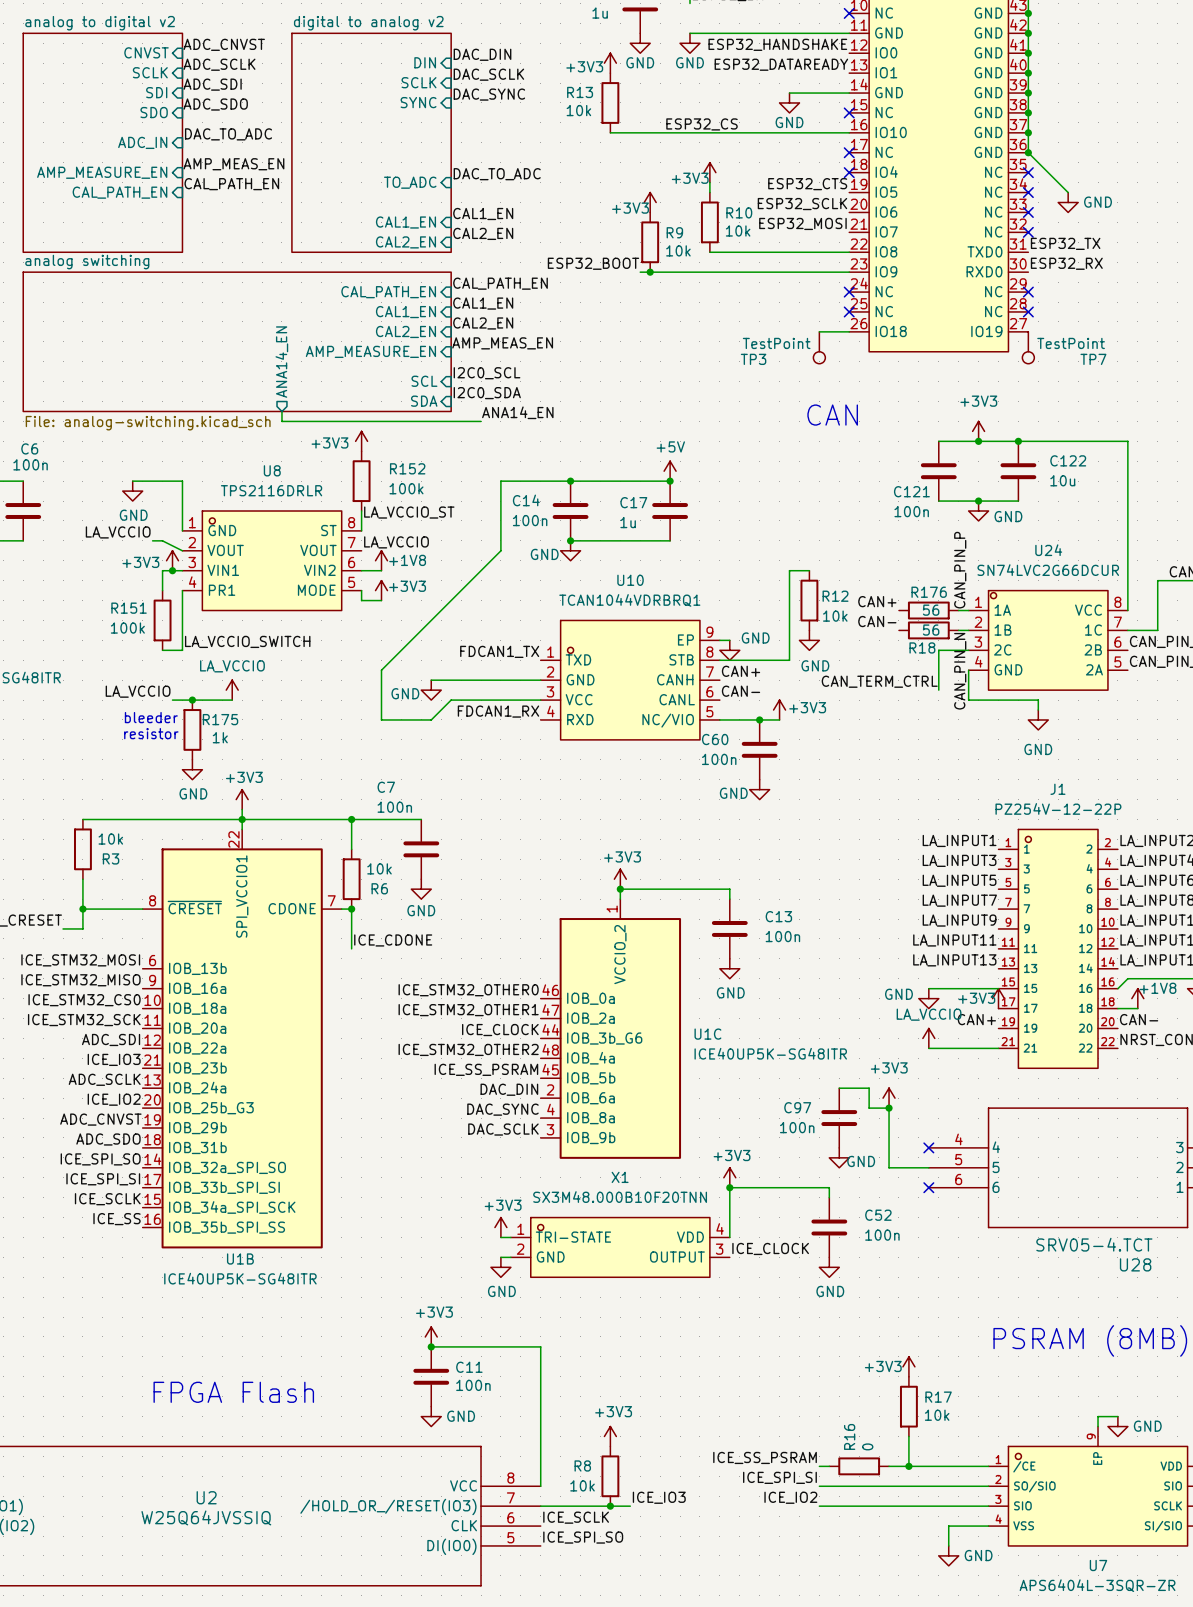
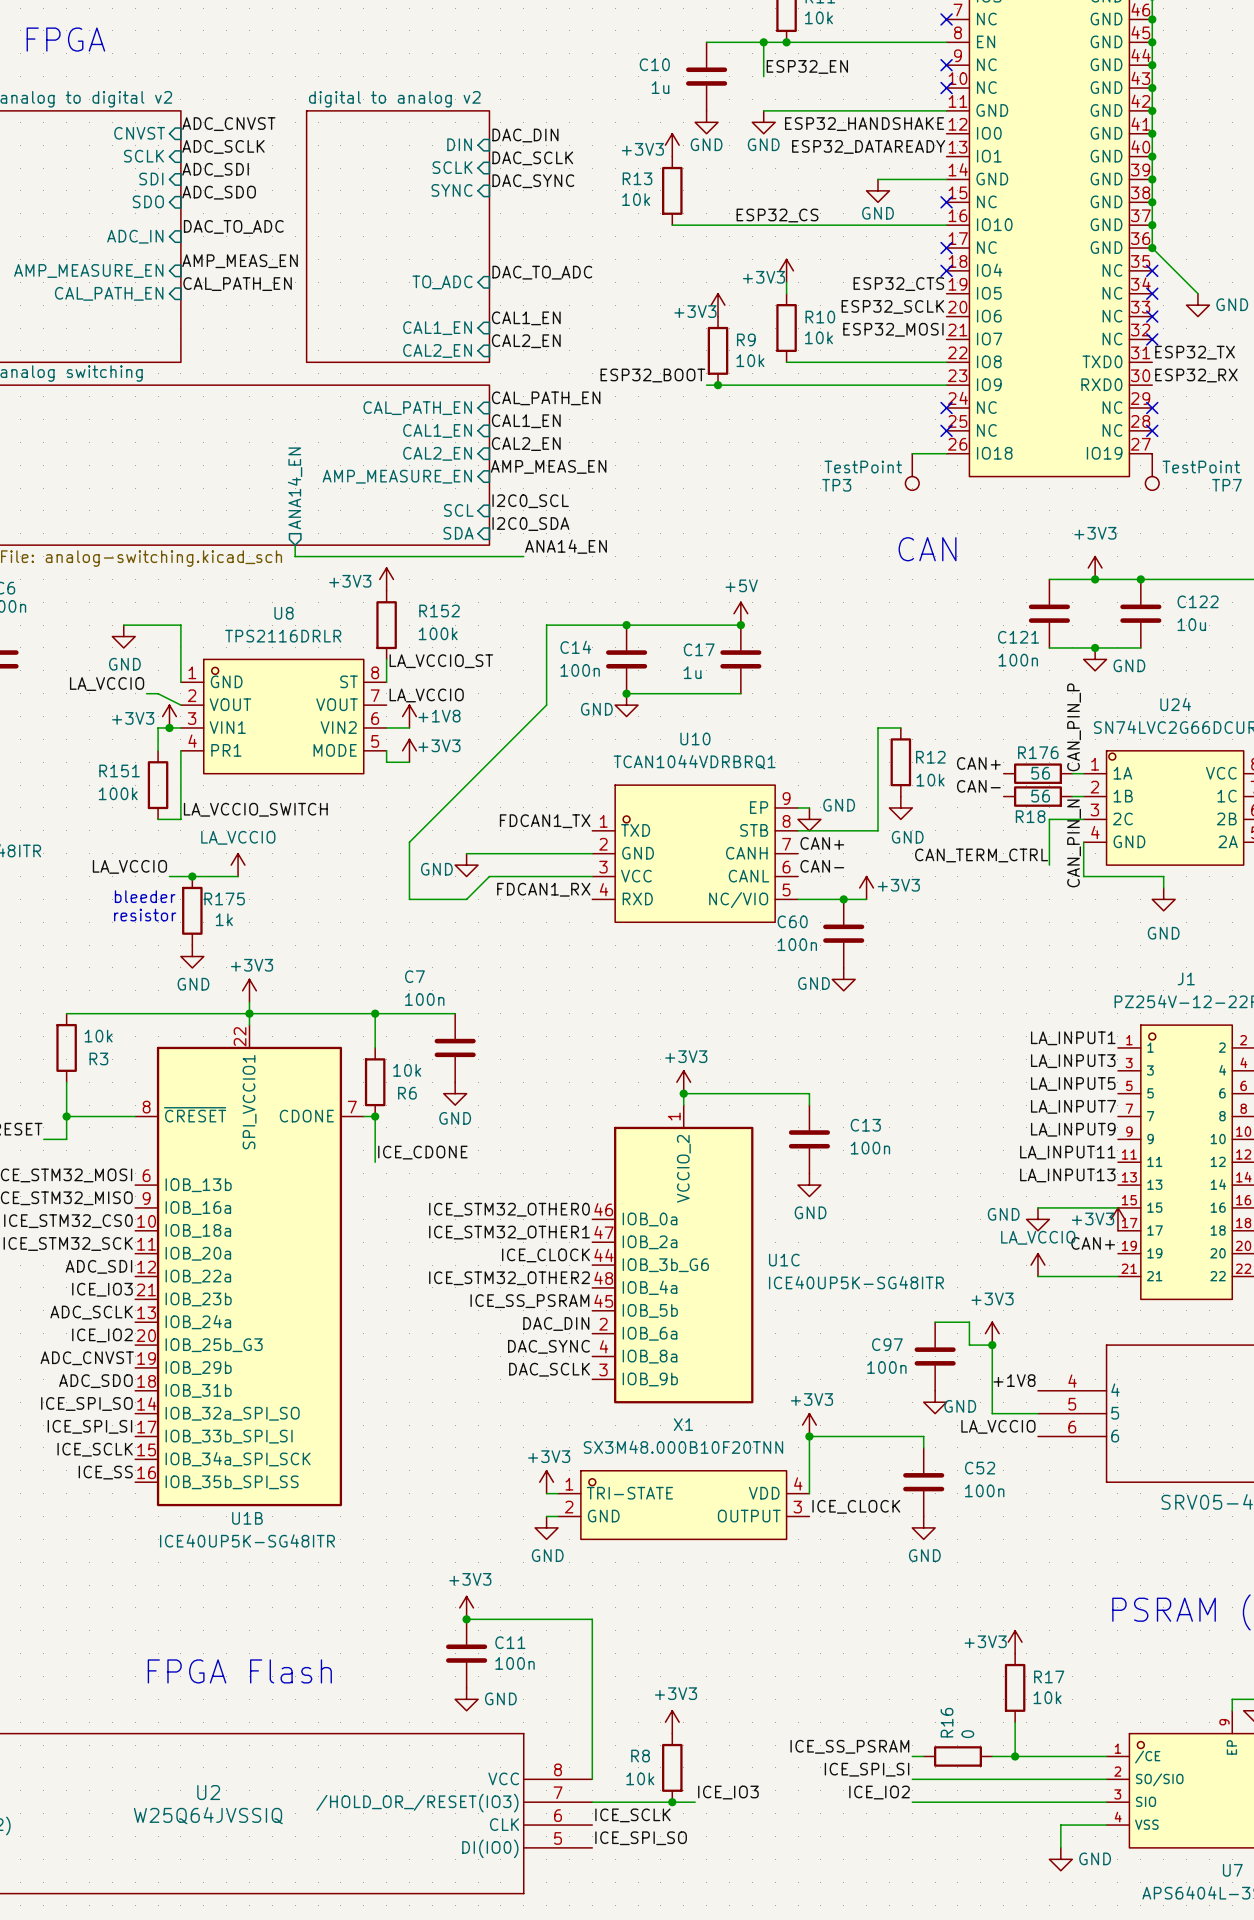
label: none -> +1V8 (1014, 1380)
no-connect mark: (928, 1147) -> none
label: none -> LA_VCCIO (998, 1426)
no-connect mark: (928, 1187) -> none

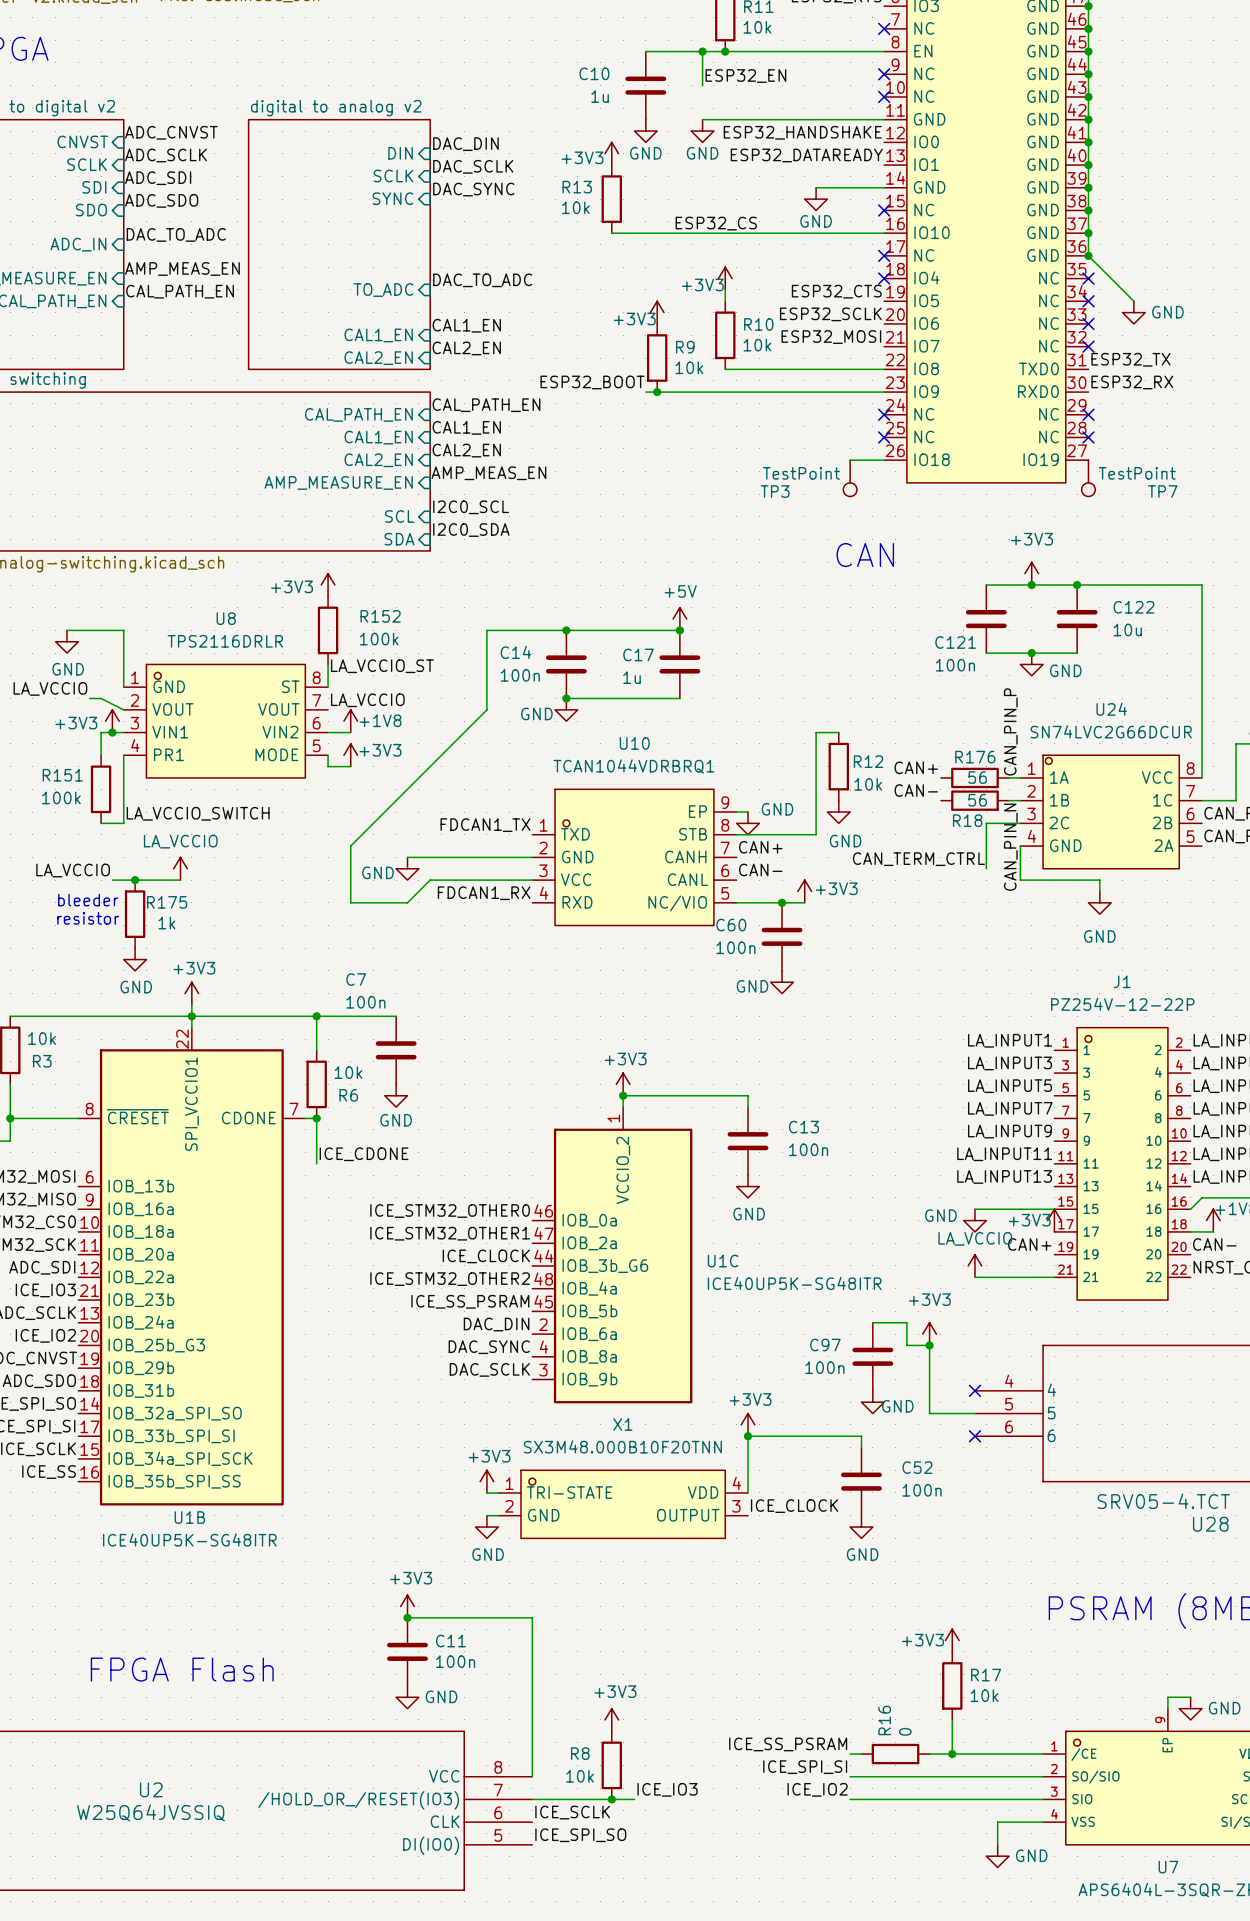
sheet pin: ANA14_EN (295, 488) -> none
wire: (295, 545) (295, 556) (523, 556) -> none
label: ANA14_EN (566, 546) -> none
label: +1V8 (1014, 1380) -> none
no-connect mark: none -> (974, 1390)
label: LA_VCCIO (998, 1426) -> none
no-connect mark: none -> (974, 1436)

